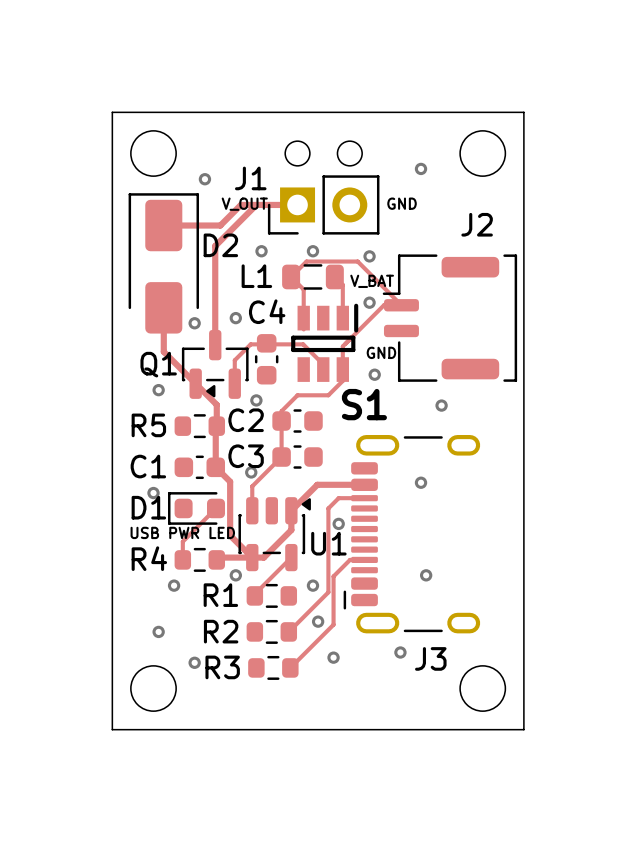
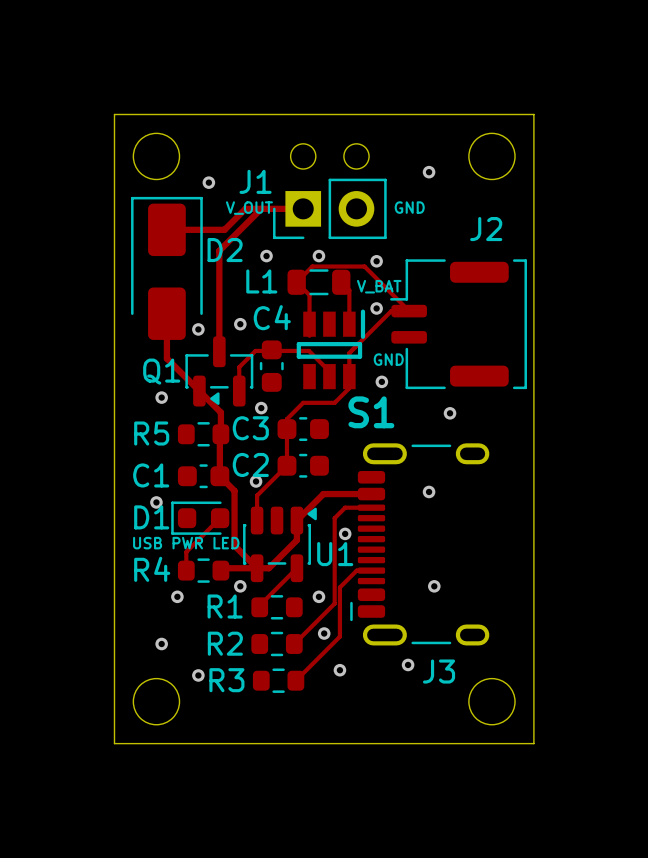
C2 name: C2 (246, 420) -> C3 (250, 428)
C3 name: C3 (246, 456) -> C2 (250, 464)

